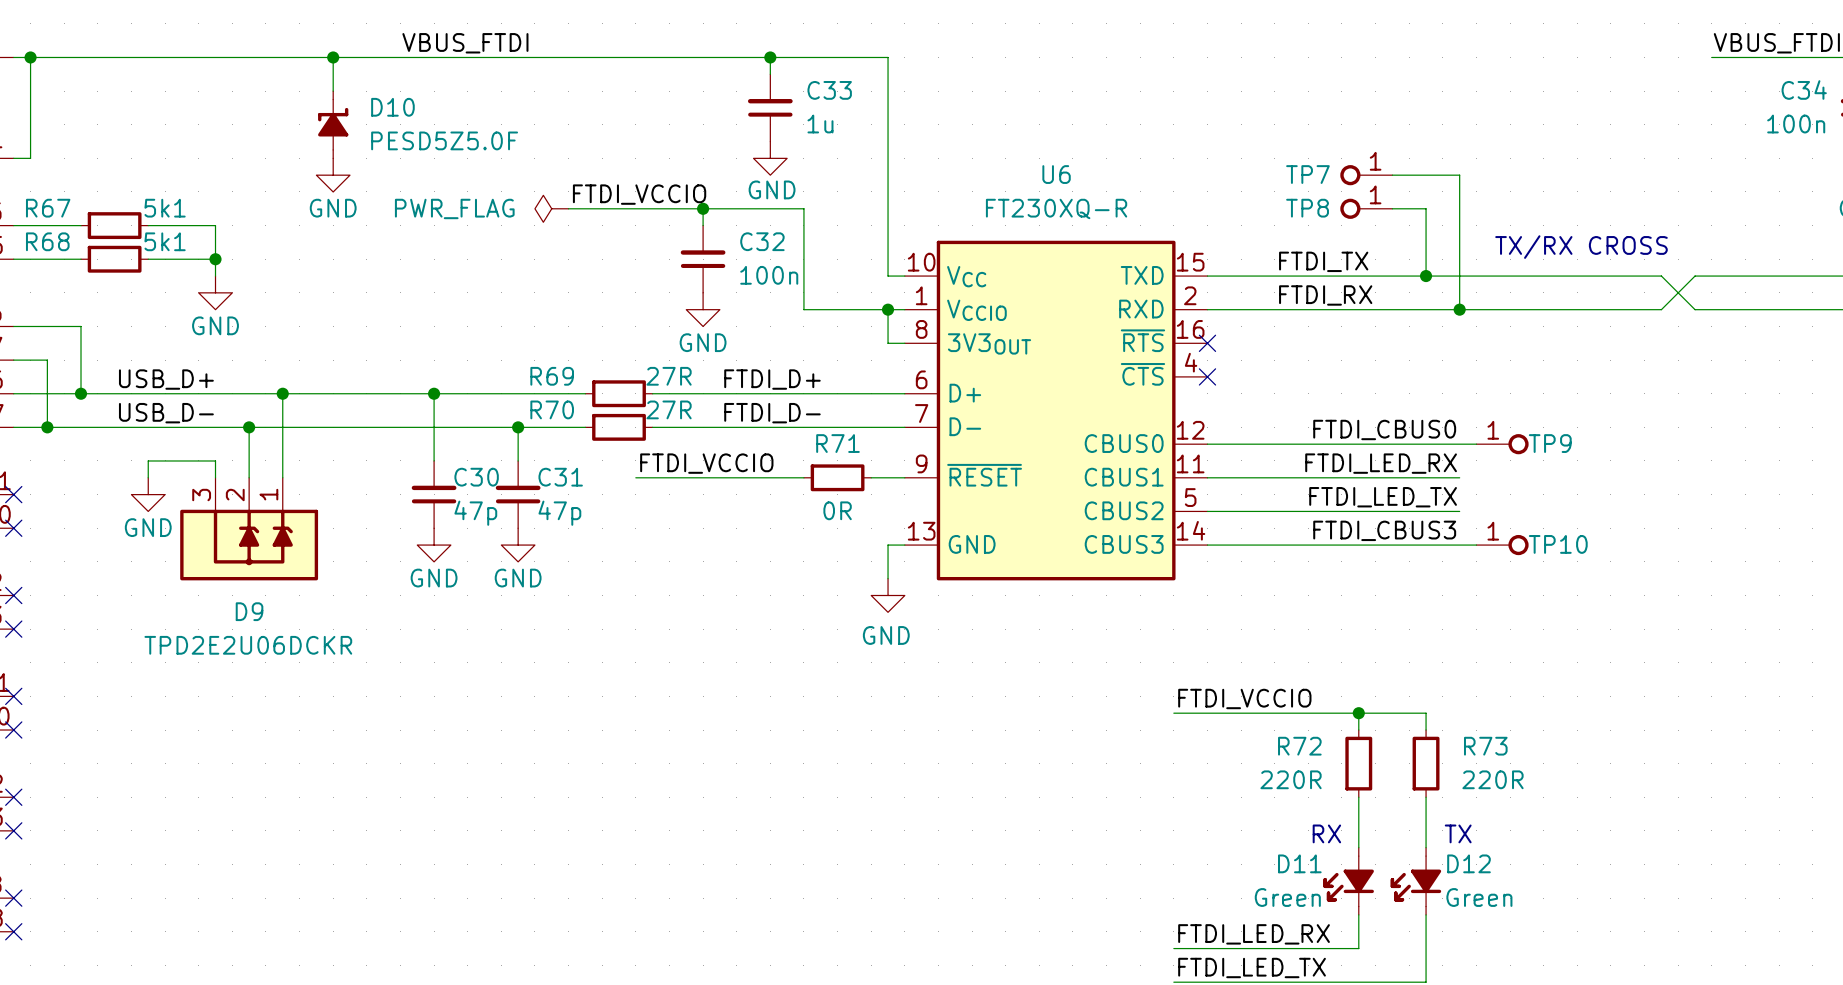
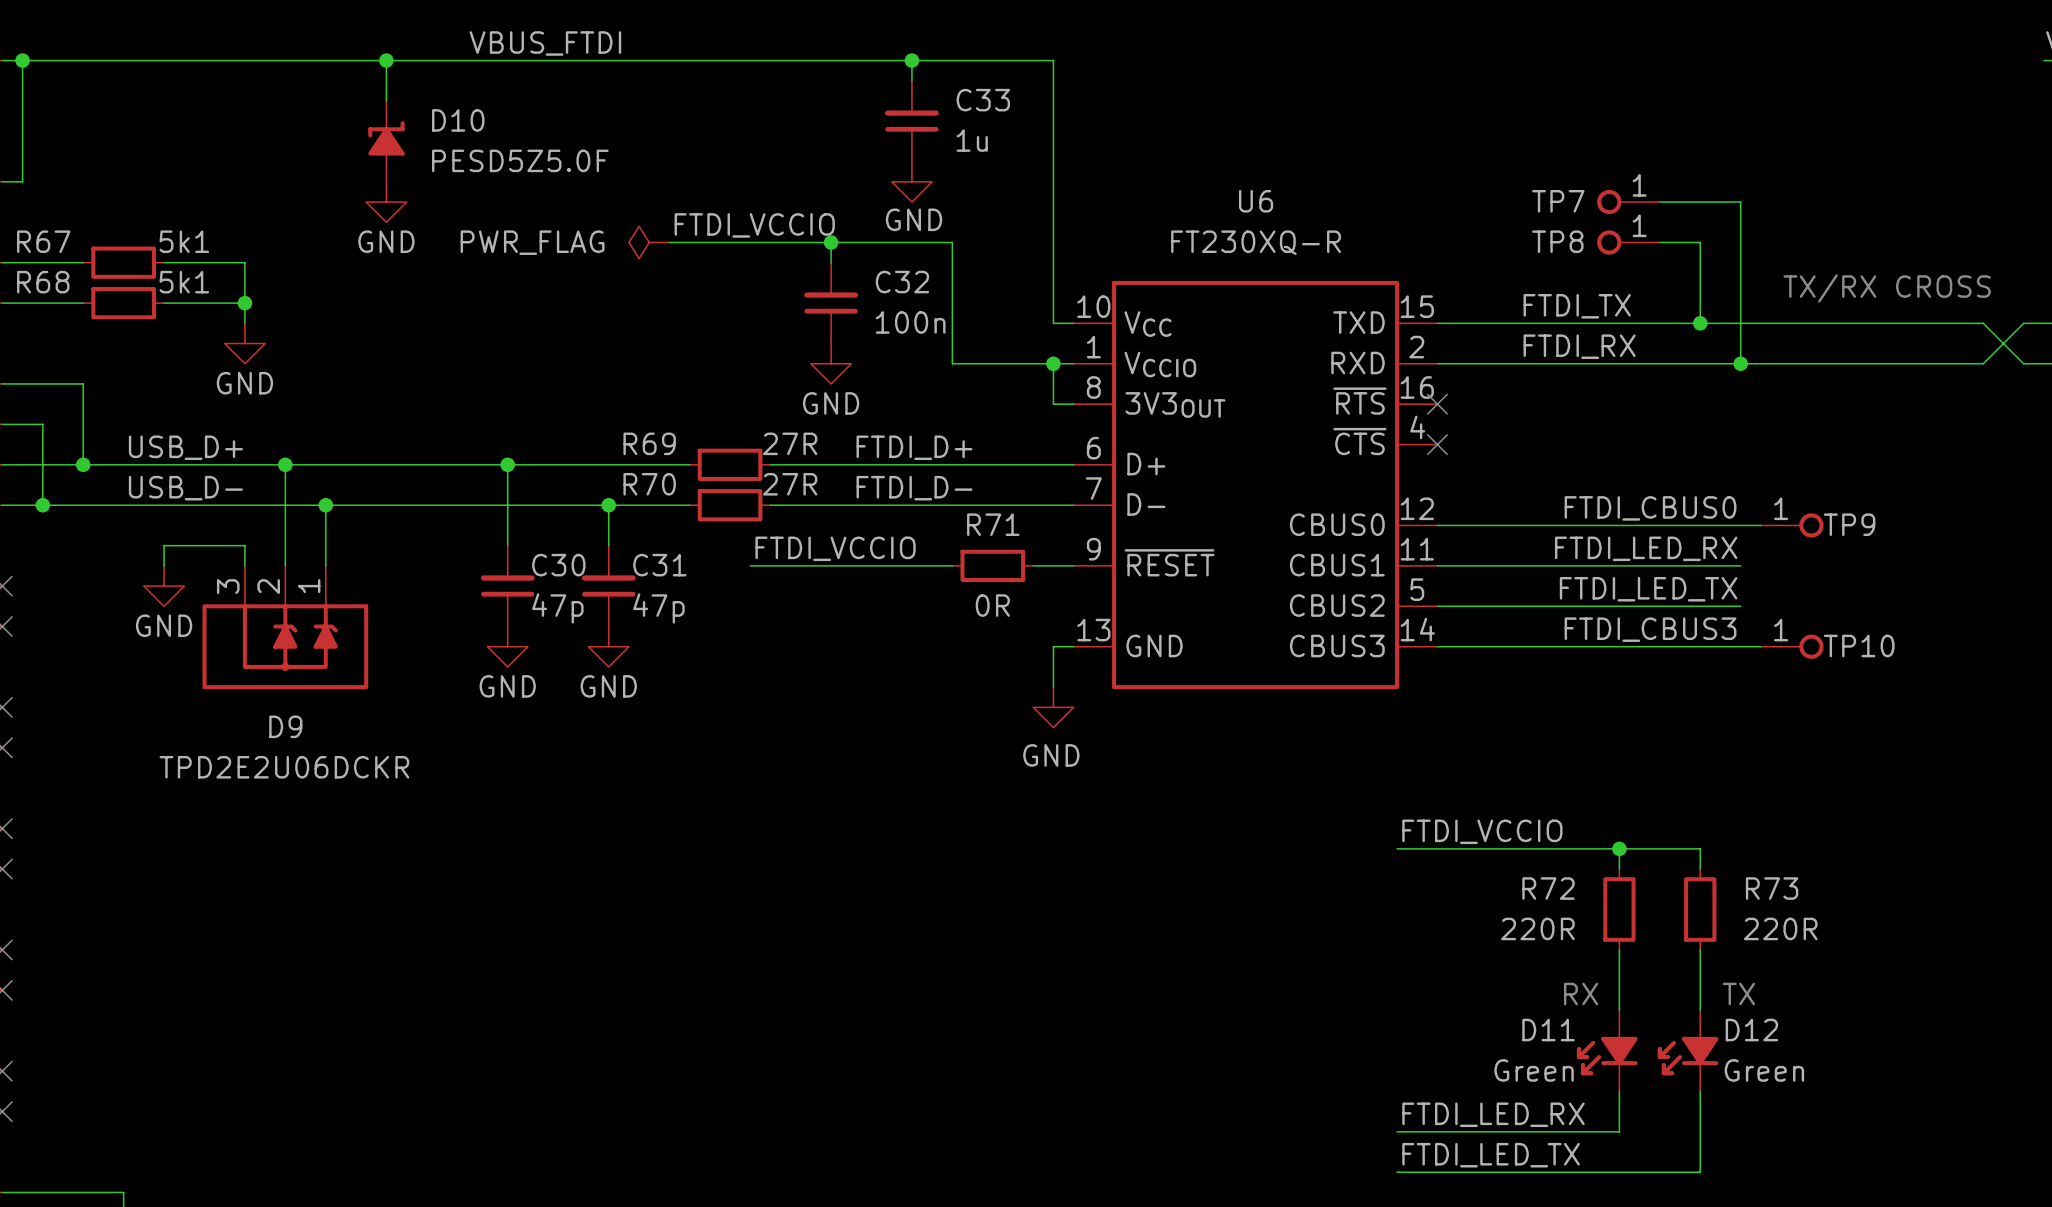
junction: none -> (285, 464)
wire: (282, 393) (282, 427) -> (285, 464) (285, 505)
junction: (282, 393) -> none
junction: (249, 427) -> none
junction: none -> (325, 505)

